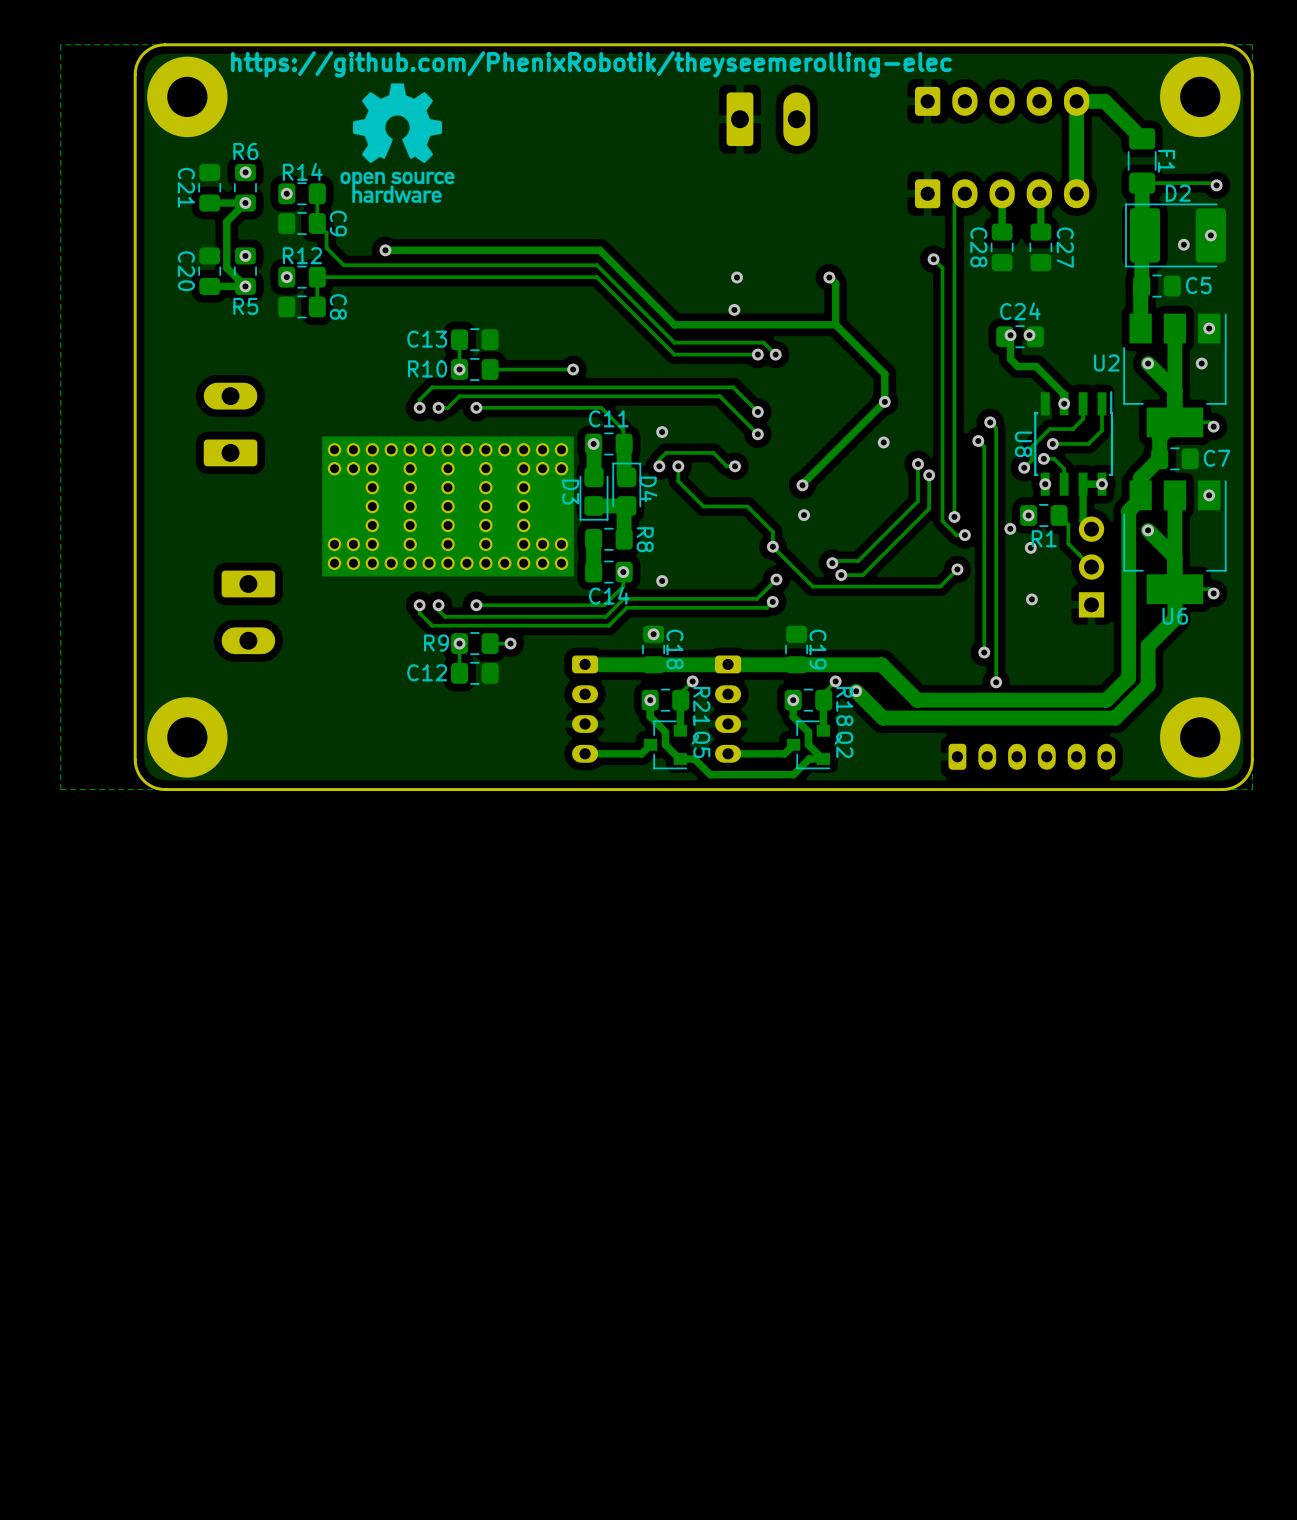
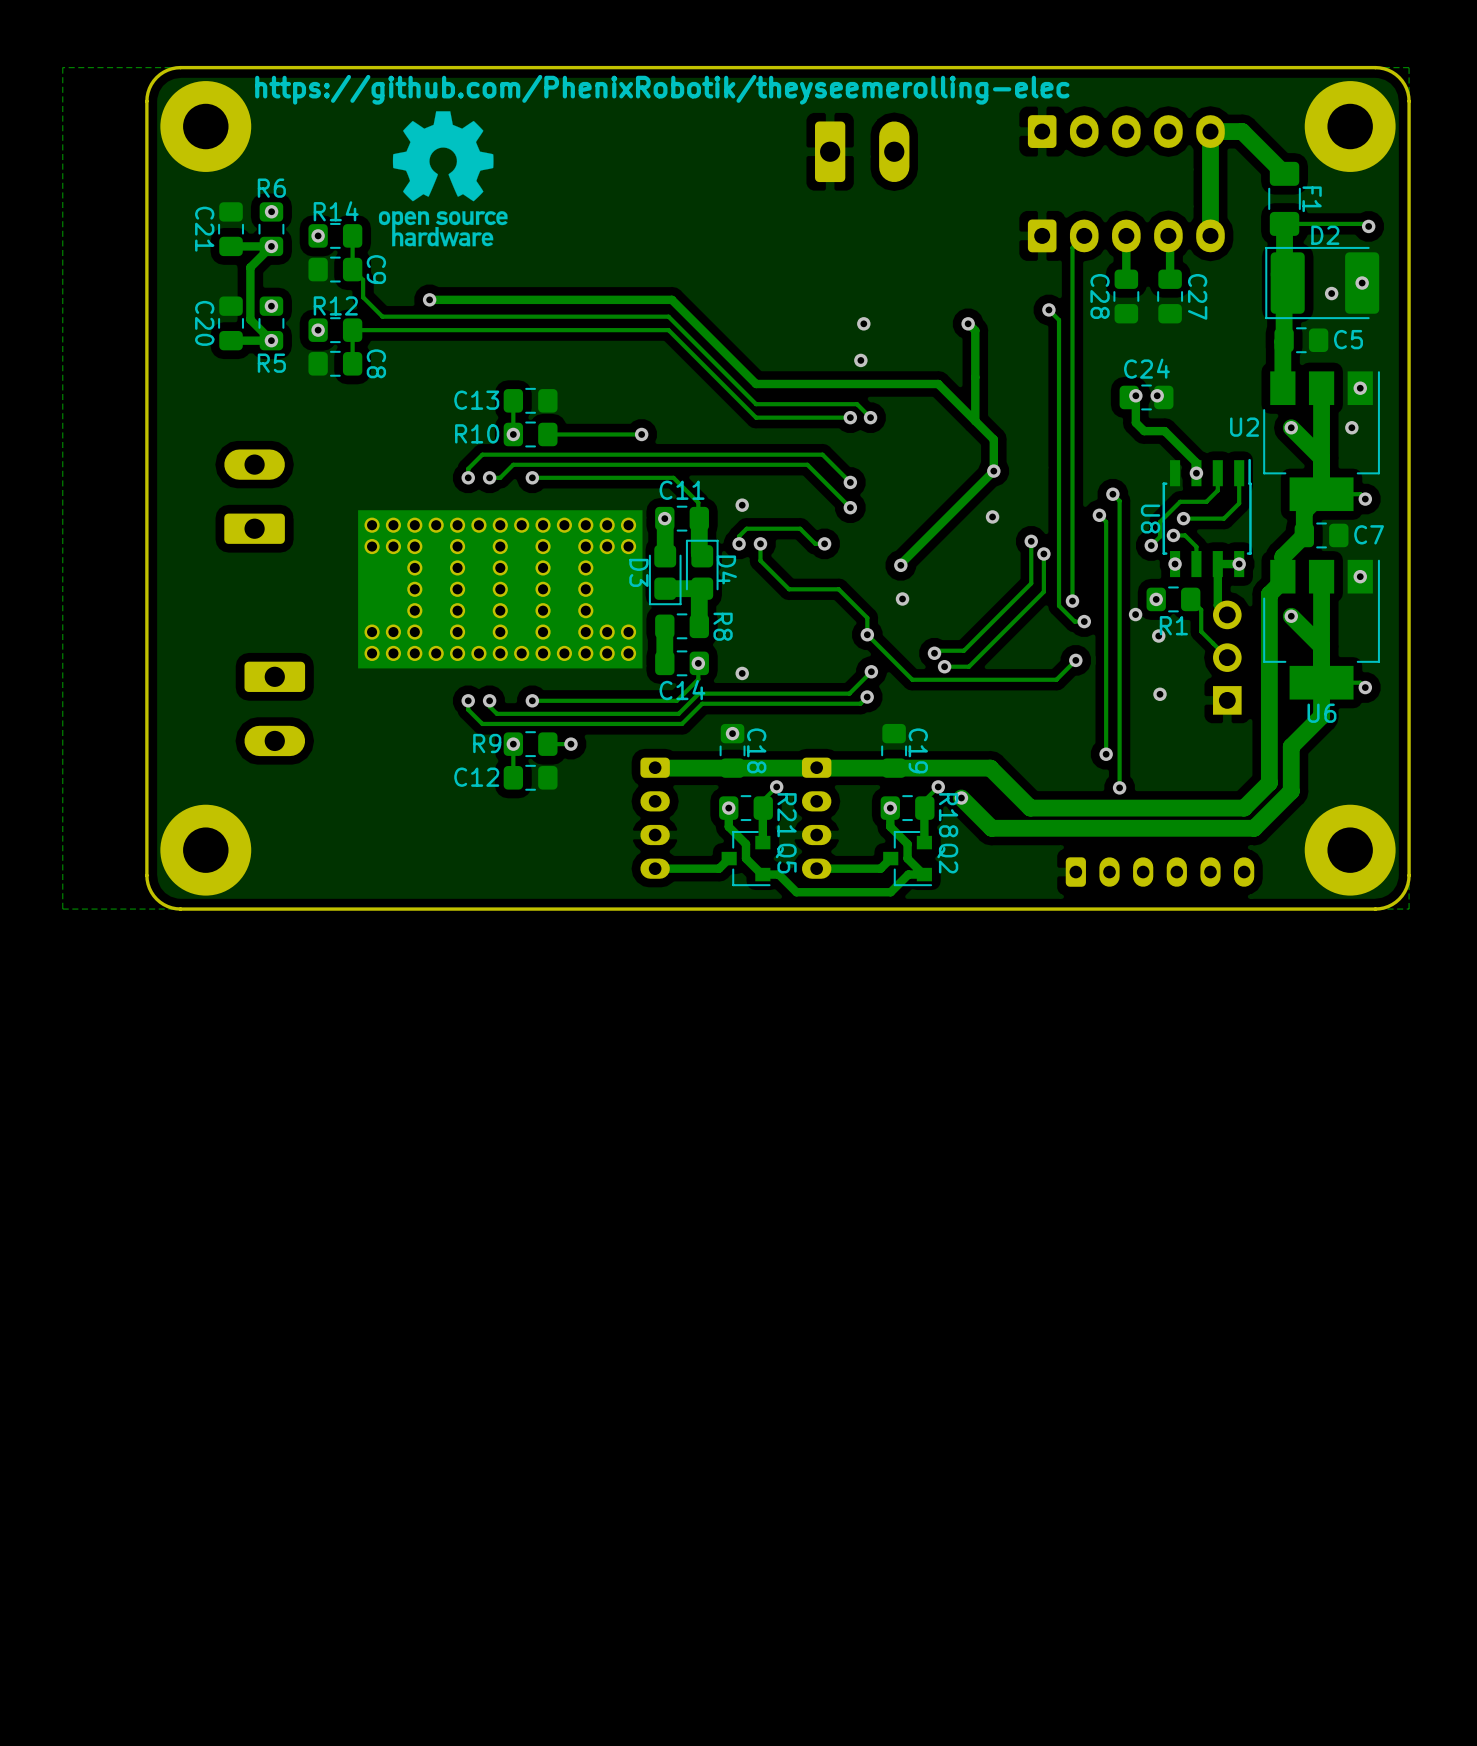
via: none -> (863, 323)
track: none -> (968, 323) (975, 330) (975, 421)
via: none -> (968, 323)
via: (737, 277) -> none
track: (829, 277) (835, 283) (835, 324) -> none
via: (829, 277) -> none
via: none -> (860, 360)
via: (734, 309) -> none

